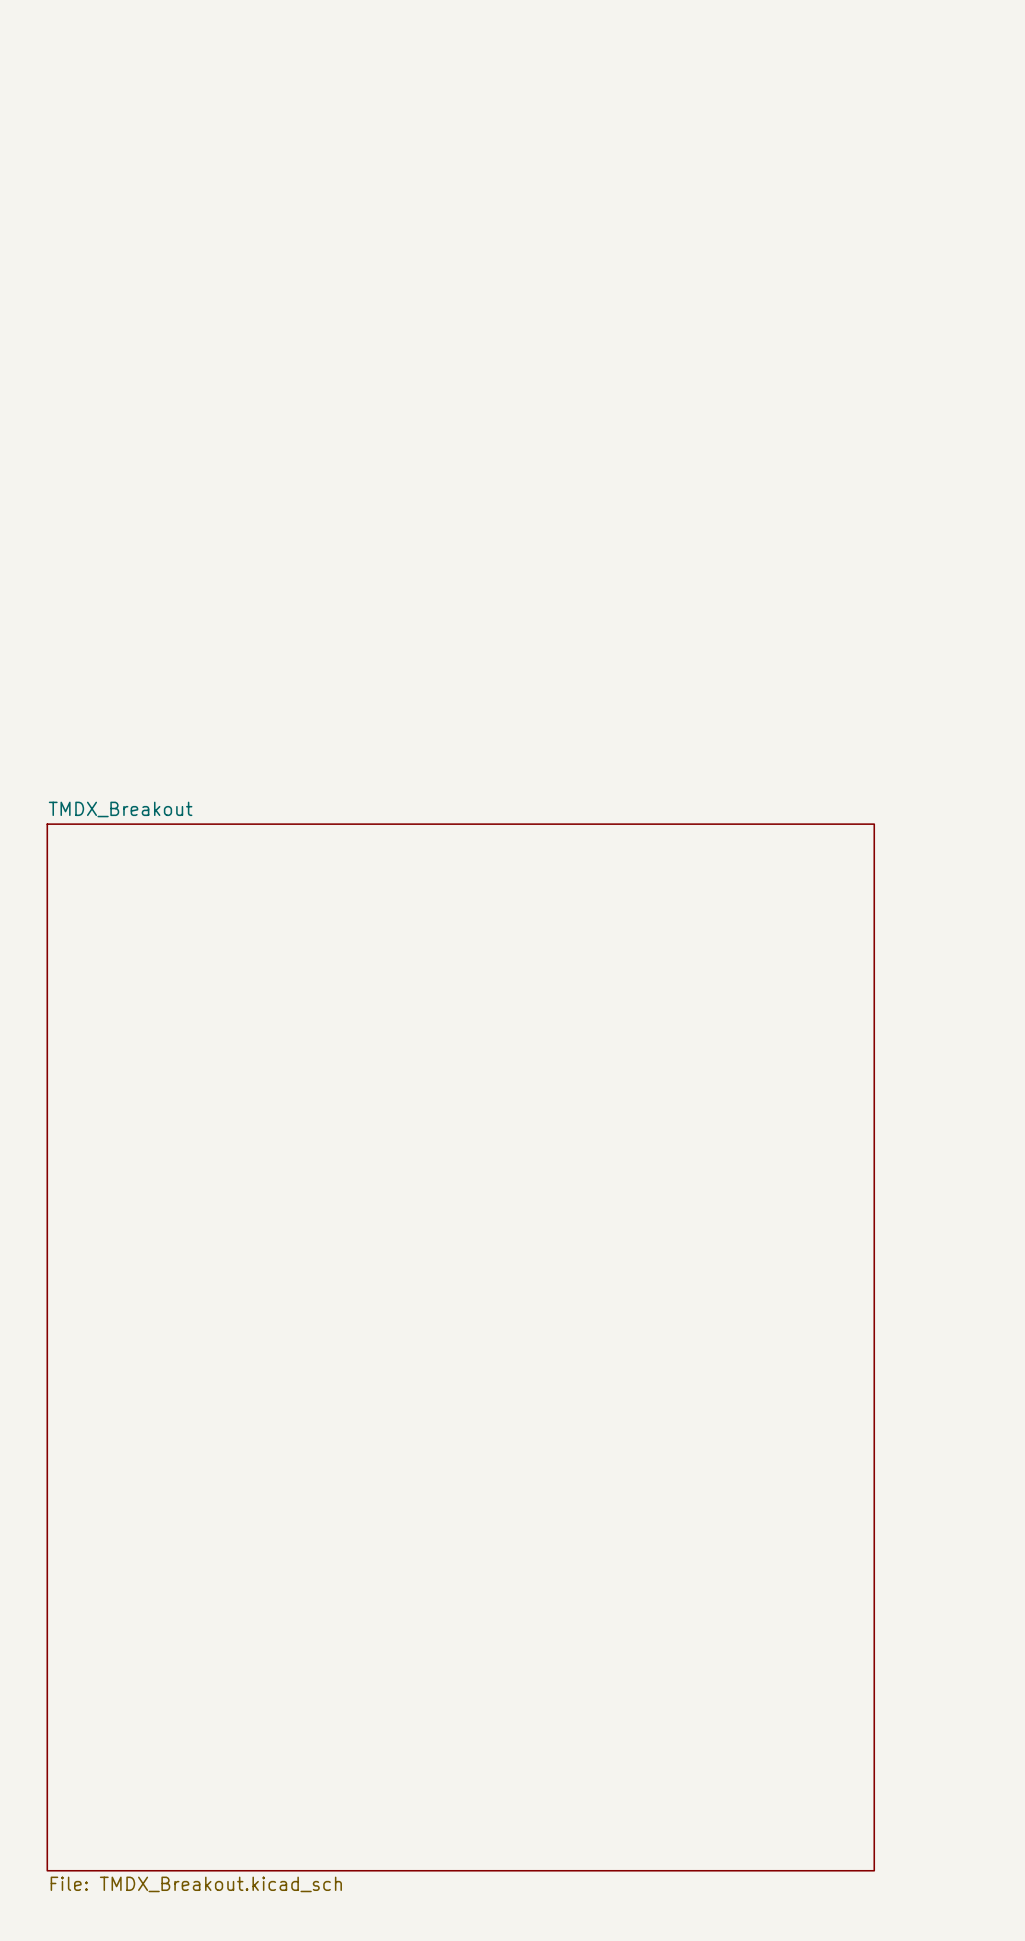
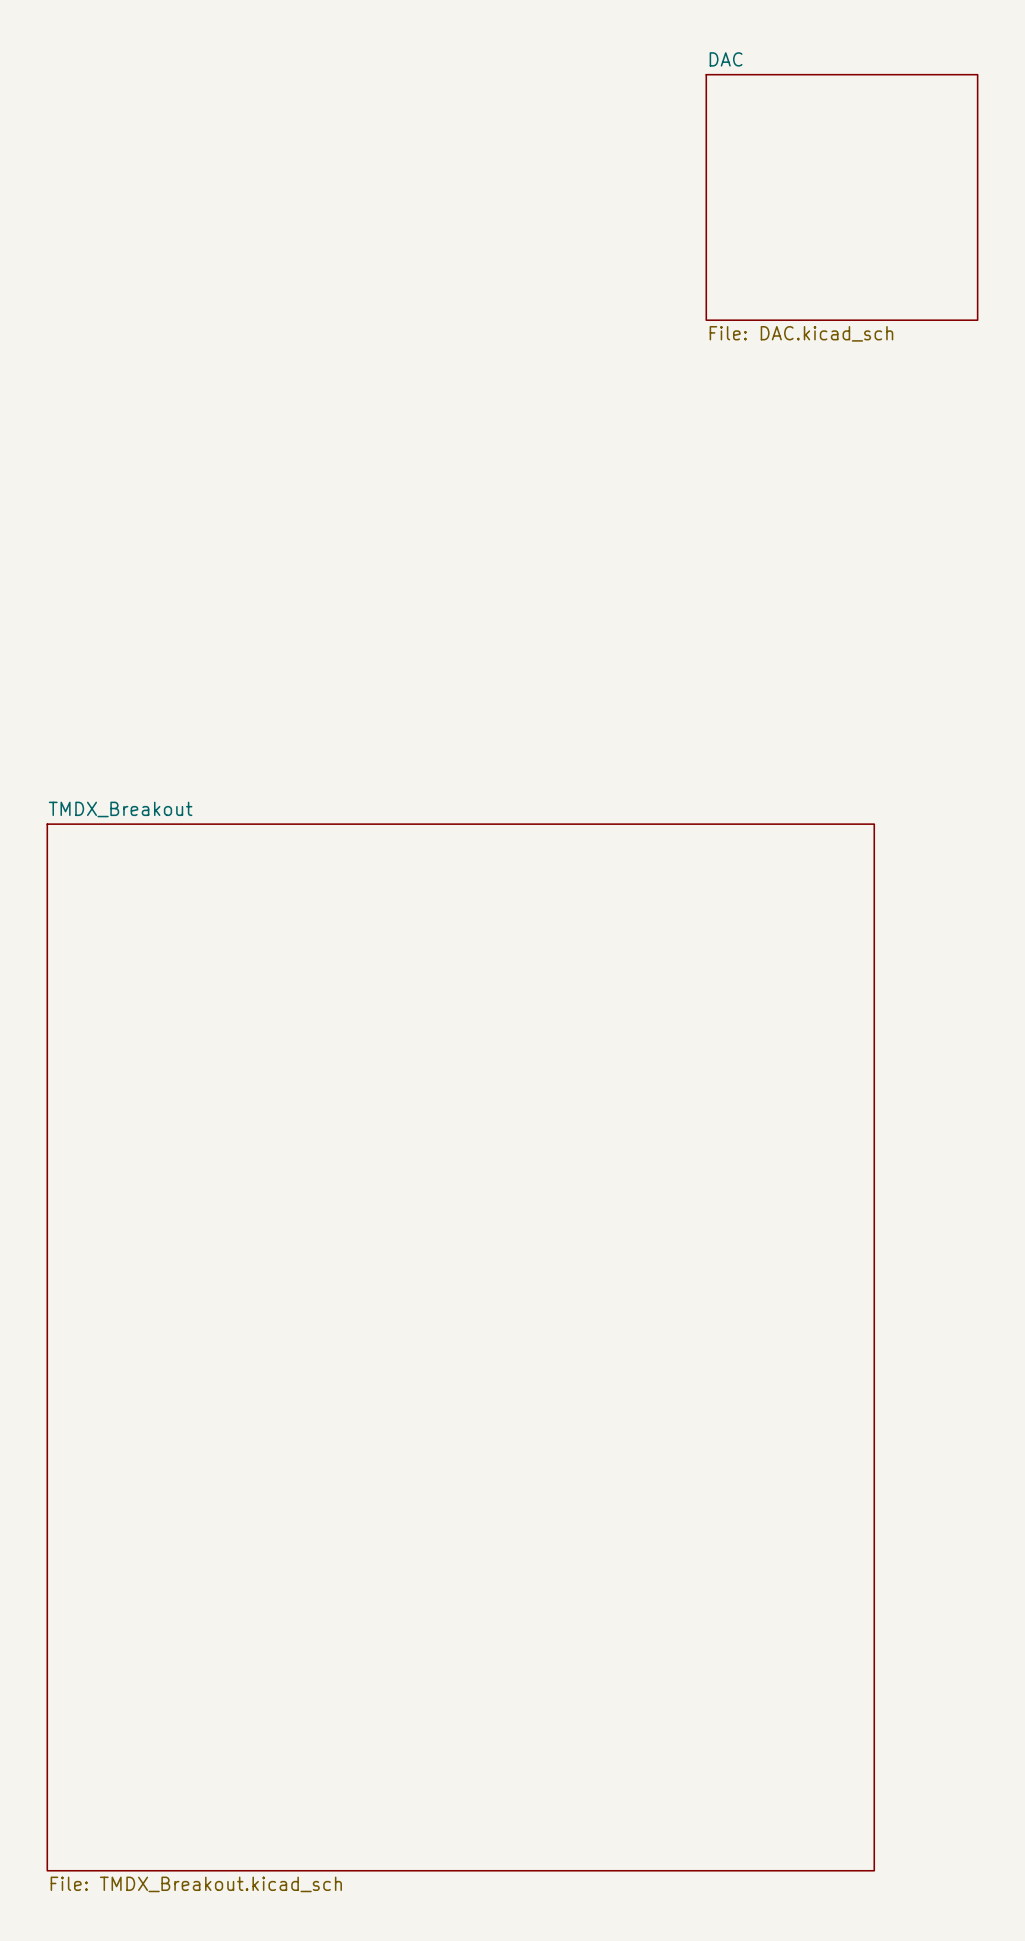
sheet DAC: none -> File: DAC.kicad_sch (841, 197)

